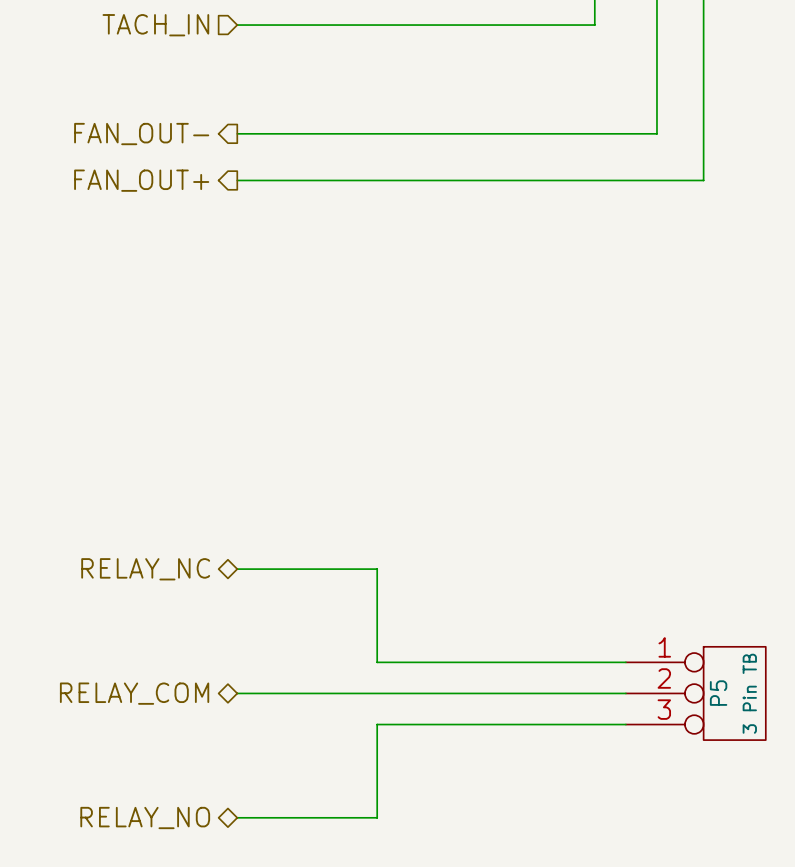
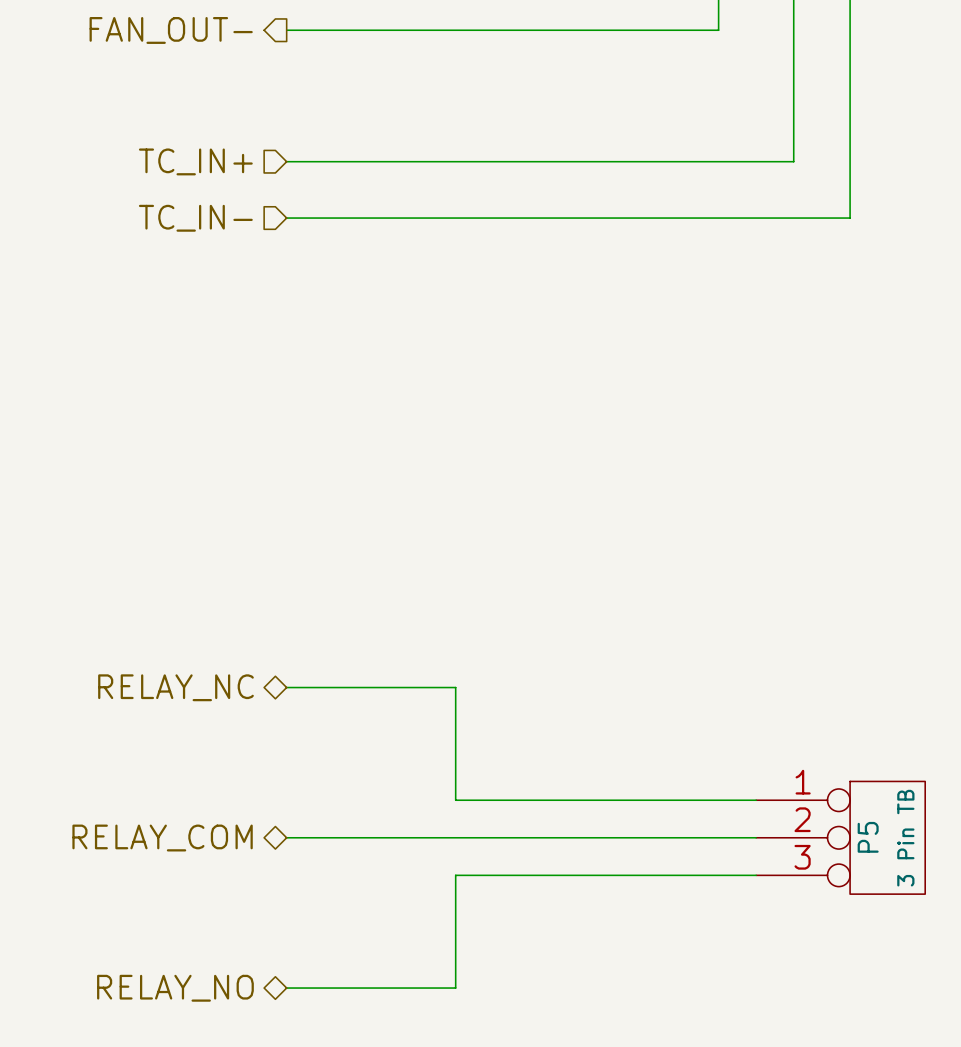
hierarchical label shape: input (155, 25) -> output (171, 30)
hierarchical label: TACH_IN (155, 25) -> FAN_OUT- (171, 30)
hierarchical label shape: output (141, 134) -> input (195, 161)
hierarchical label: FAN_OUT- (141, 134) -> TC_IN+ (195, 161)
hierarchical label shape: output (141, 180) -> input (195, 218)
hierarchical label: FAN_OUT+ (141, 180) -> TC_IN- (195, 218)

